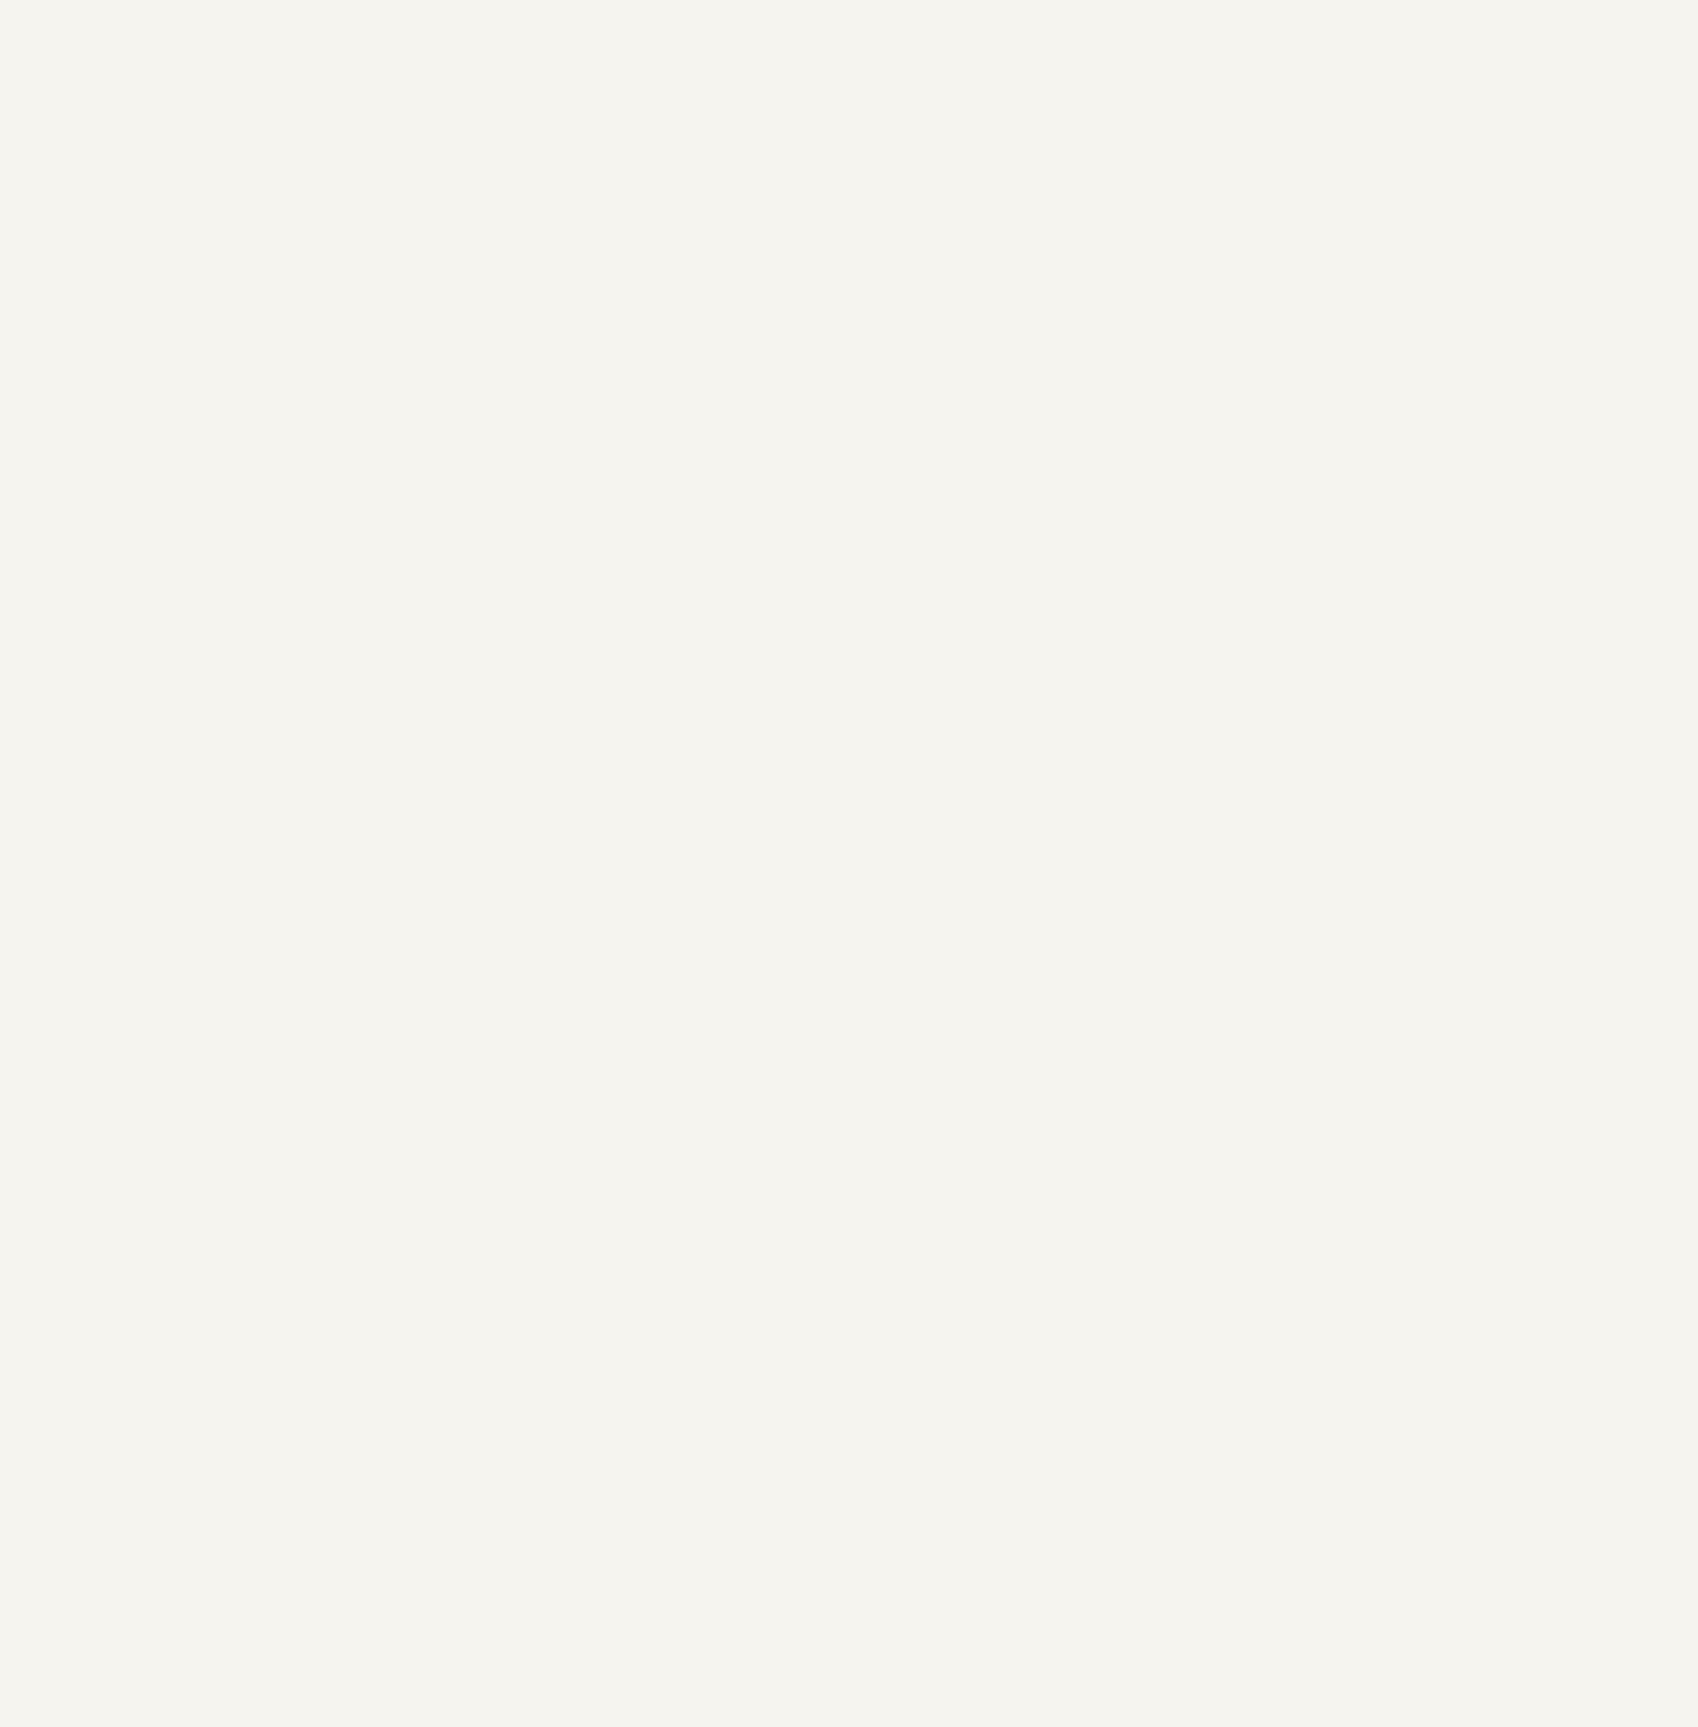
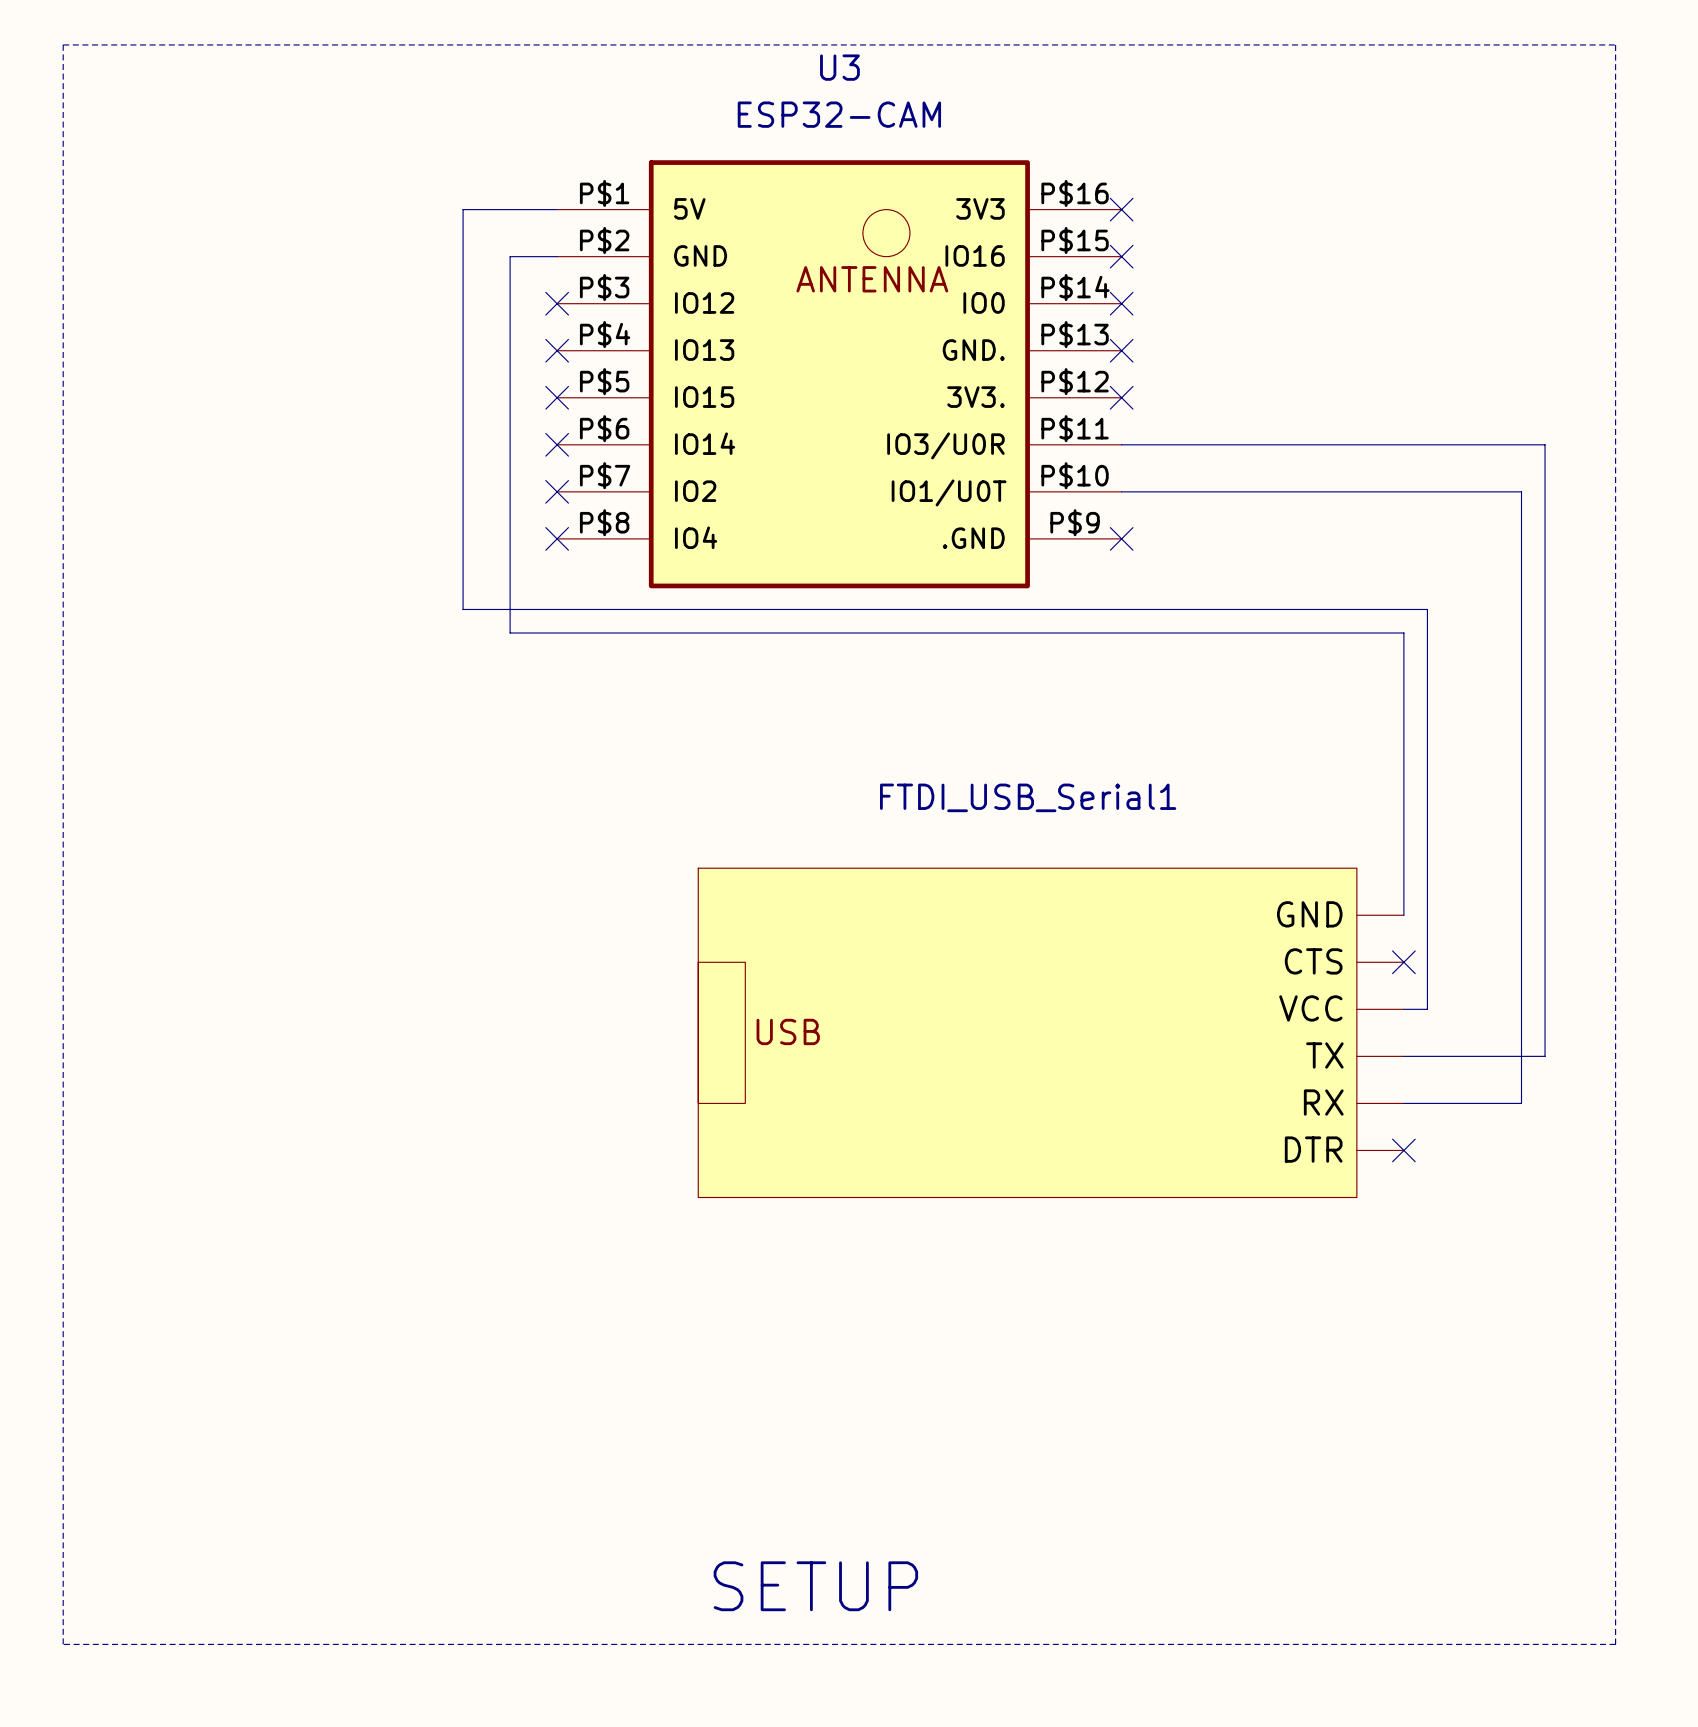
line: none -> (63, 44) (1615, 44) (1615, 1644) (63, 1644) (63, 44)
wire: none -> (557, 209) (463, 209) (463, 609) (1427, 609) (1427, 1009) (1403, 1009)
no-connect mark: none -> (1121, 209)
wire: none -> (557, 256) (510, 256) (510, 632) (1403, 632) (1403, 915)
no-connect mark: none -> (1121, 256)
no-connect mark: none -> (557, 303)
no-connect mark: none -> (1121, 303)
no-connect mark: none -> (557, 350)
no-connect mark: none -> (1121, 350)
U3: none -> ESP32-CAM (839, 374)
no-connect mark: none -> (557, 397)
no-connect mark: none -> (1121, 397)
no-connect mark: none -> (557, 444)
wire: none -> (1121, 444) (1545, 444) (1545, 1056) (1403, 1056)
no-connect mark: none -> (557, 491)
wire: none -> (1121, 491) (1521, 491) (1521, 1103) (1403, 1103)
no-connect mark: none -> (557, 538)
no-connect mark: none -> (1121, 538)
no-connect mark: none -> (1403, 962)
FTDI_USB_Serial1: none -> (1051, 1032)
no-connect mark: none -> (1403, 1150)
text: none -> SETUP (815, 1586)

